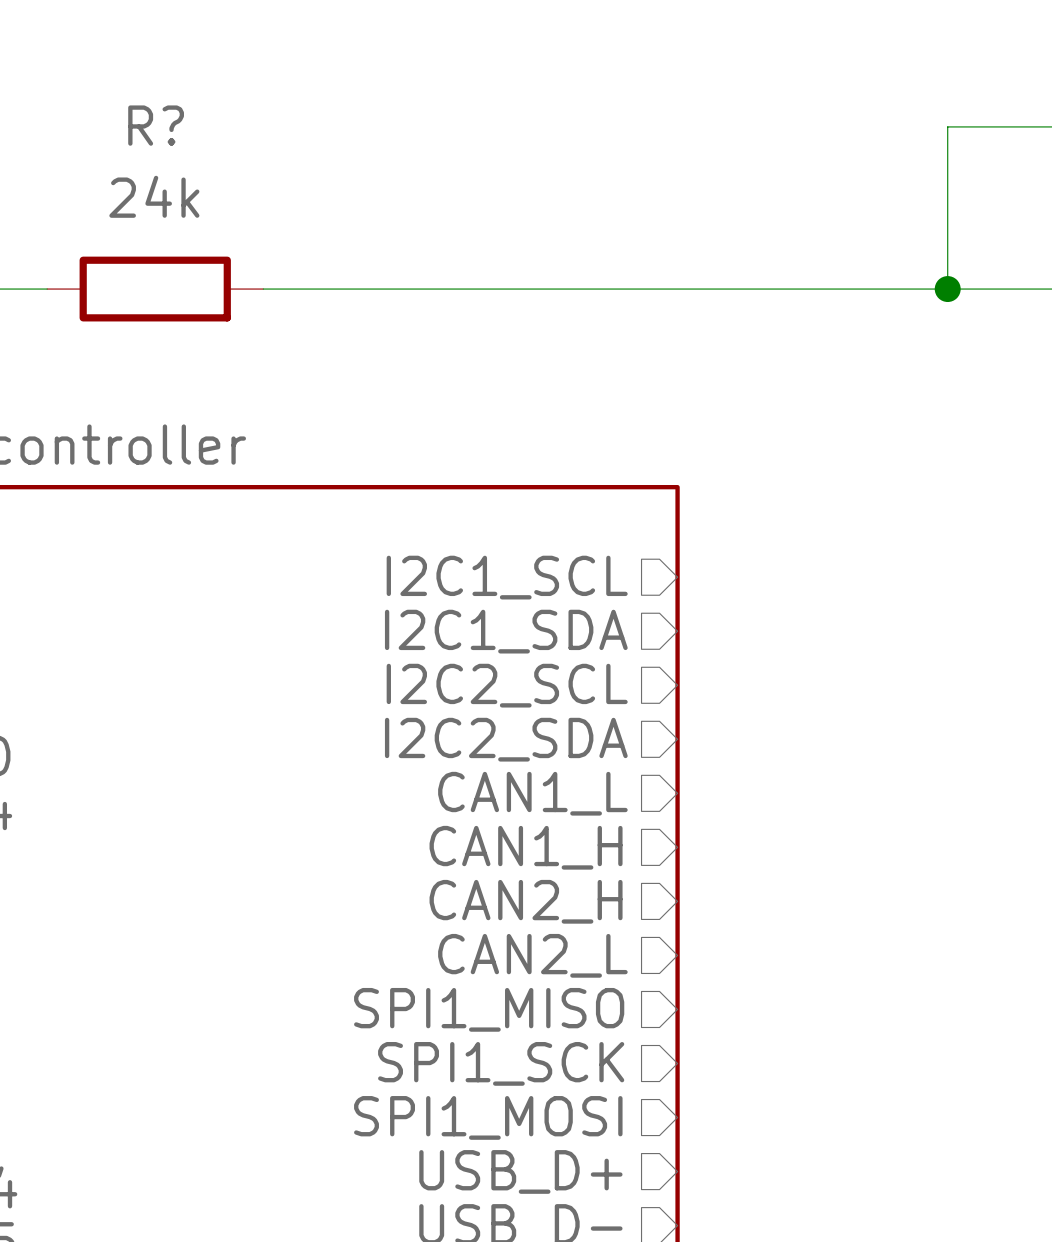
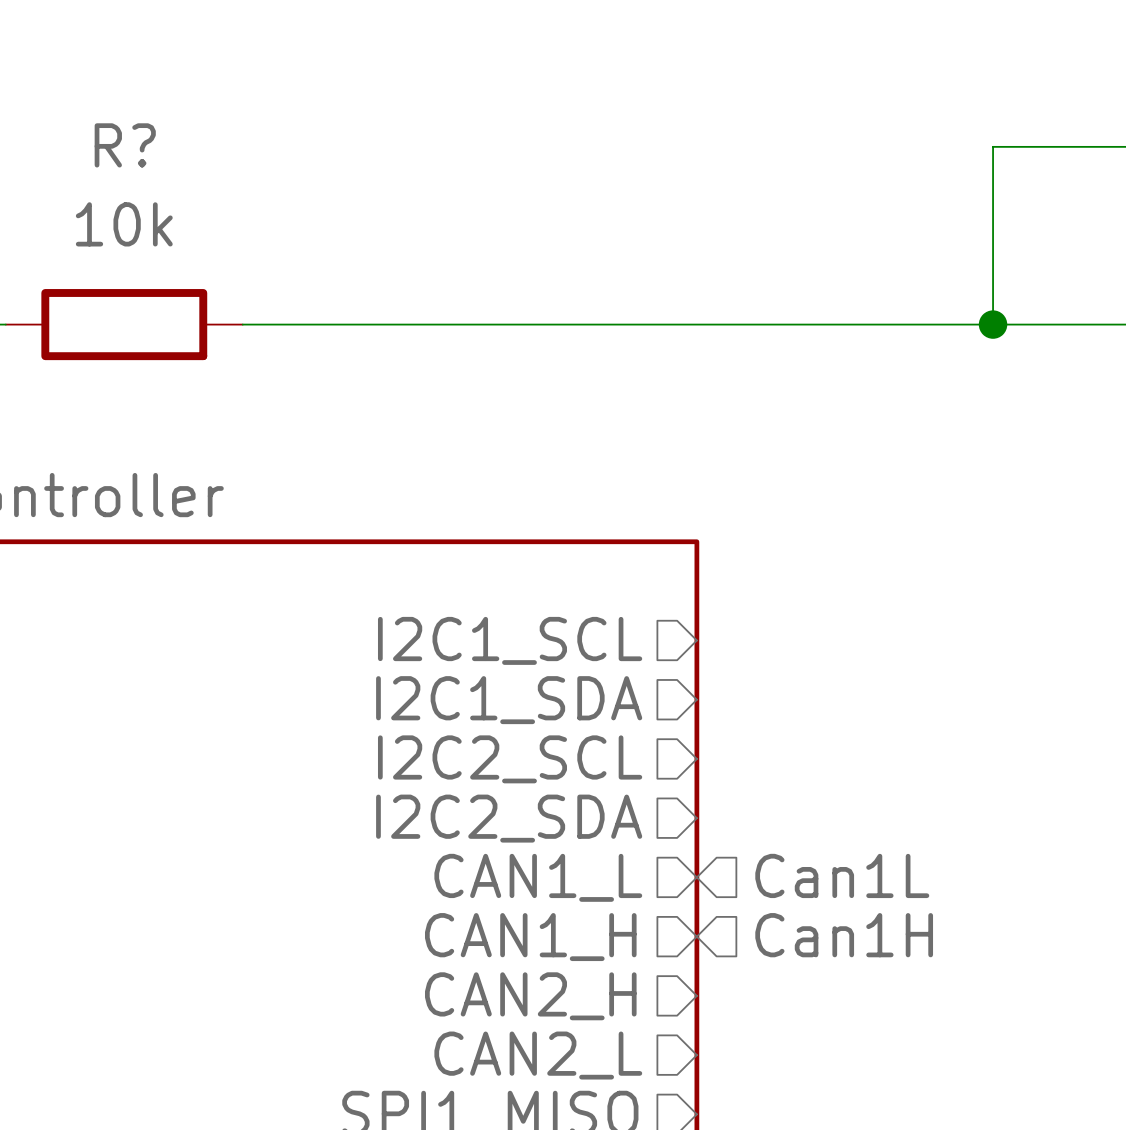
R? value: 24k (154, 196) -> 10k (124, 224)
hierarchical label: none -> Can1L (842, 875)
hierarchical label: none -> Can1H (844, 935)

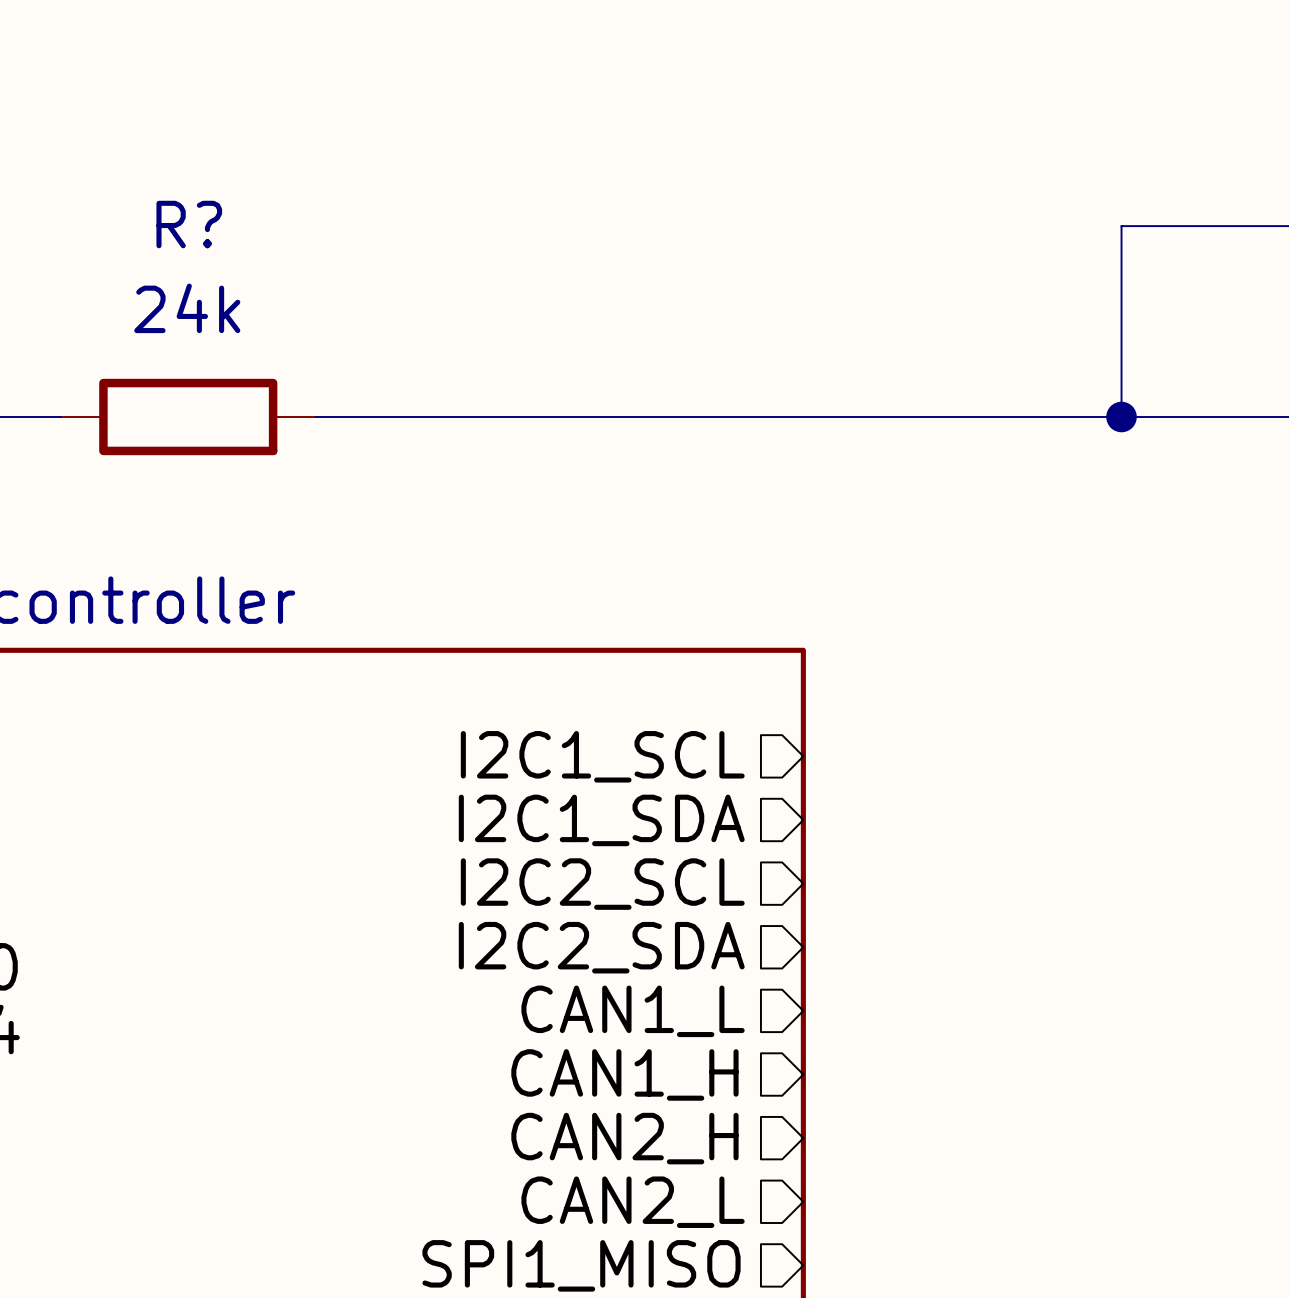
R? value: 10k (124, 224) -> 24k (187, 308)
hierarchical label: Can1L (842, 875) -> none
hierarchical label: Can1H (844, 935) -> none

